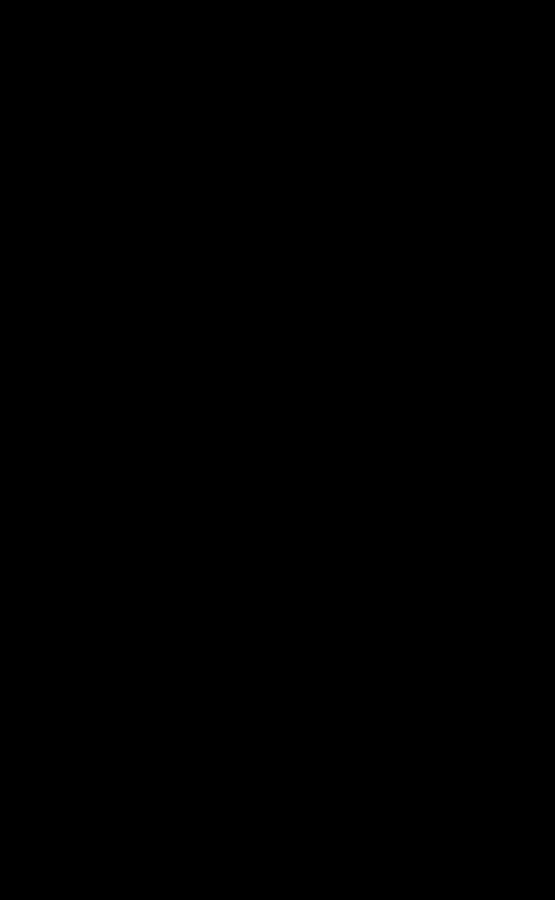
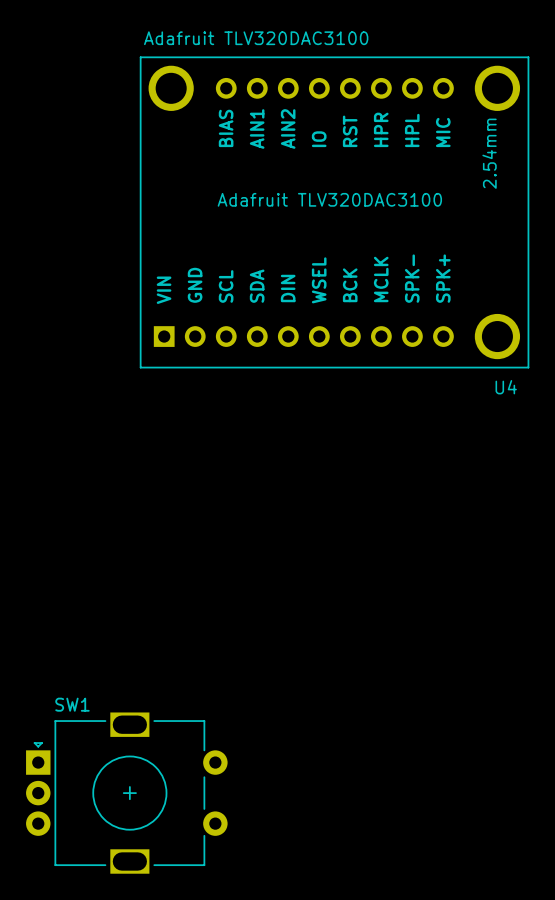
U4: none -> (334, 212)
SW1: none -> (126, 793)

